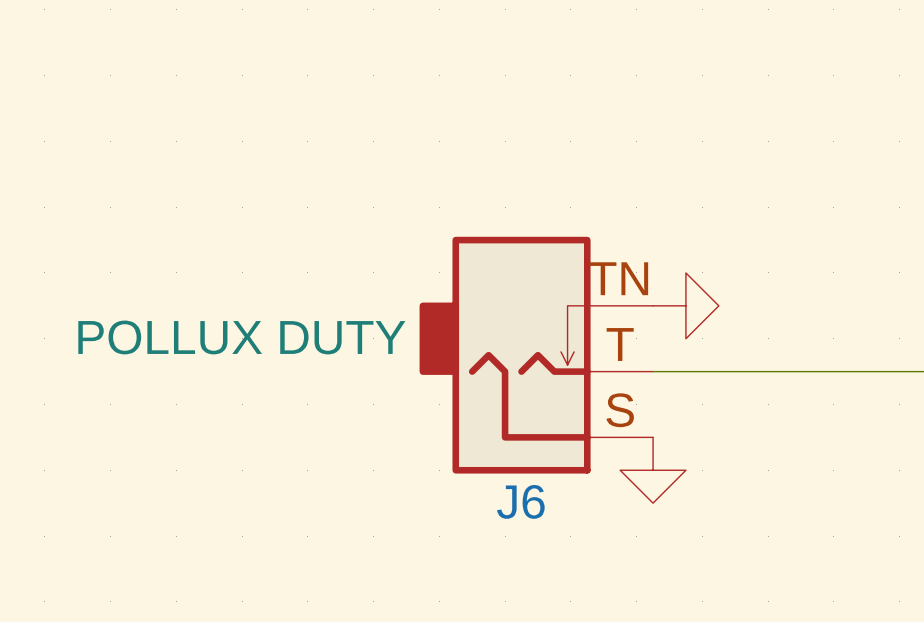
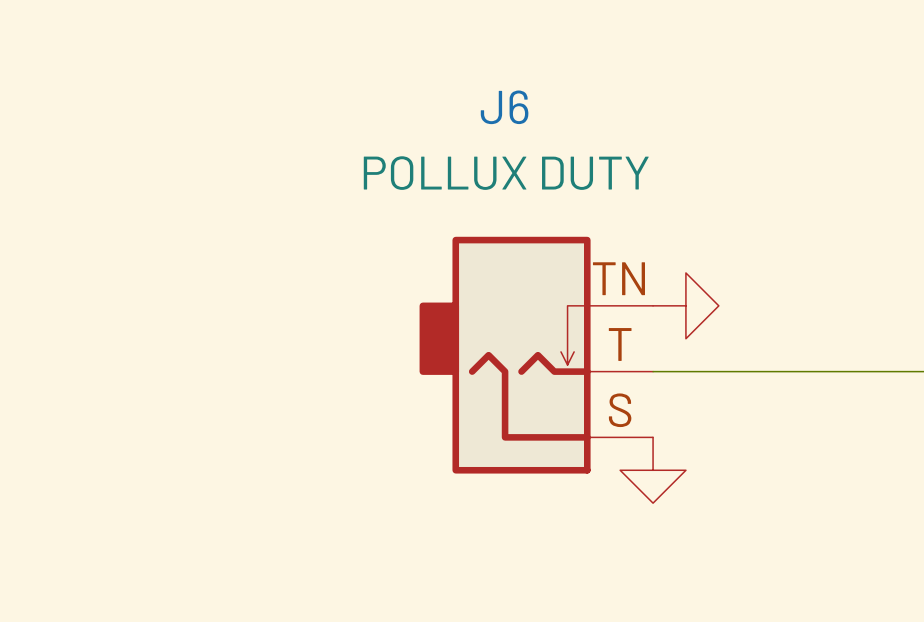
J6 value position: POLLUX DUTY (241, 337) -> POLLUX DUTY (506, 173)
J6 name position: J6 (520, 501) -> J6 (504, 107)

